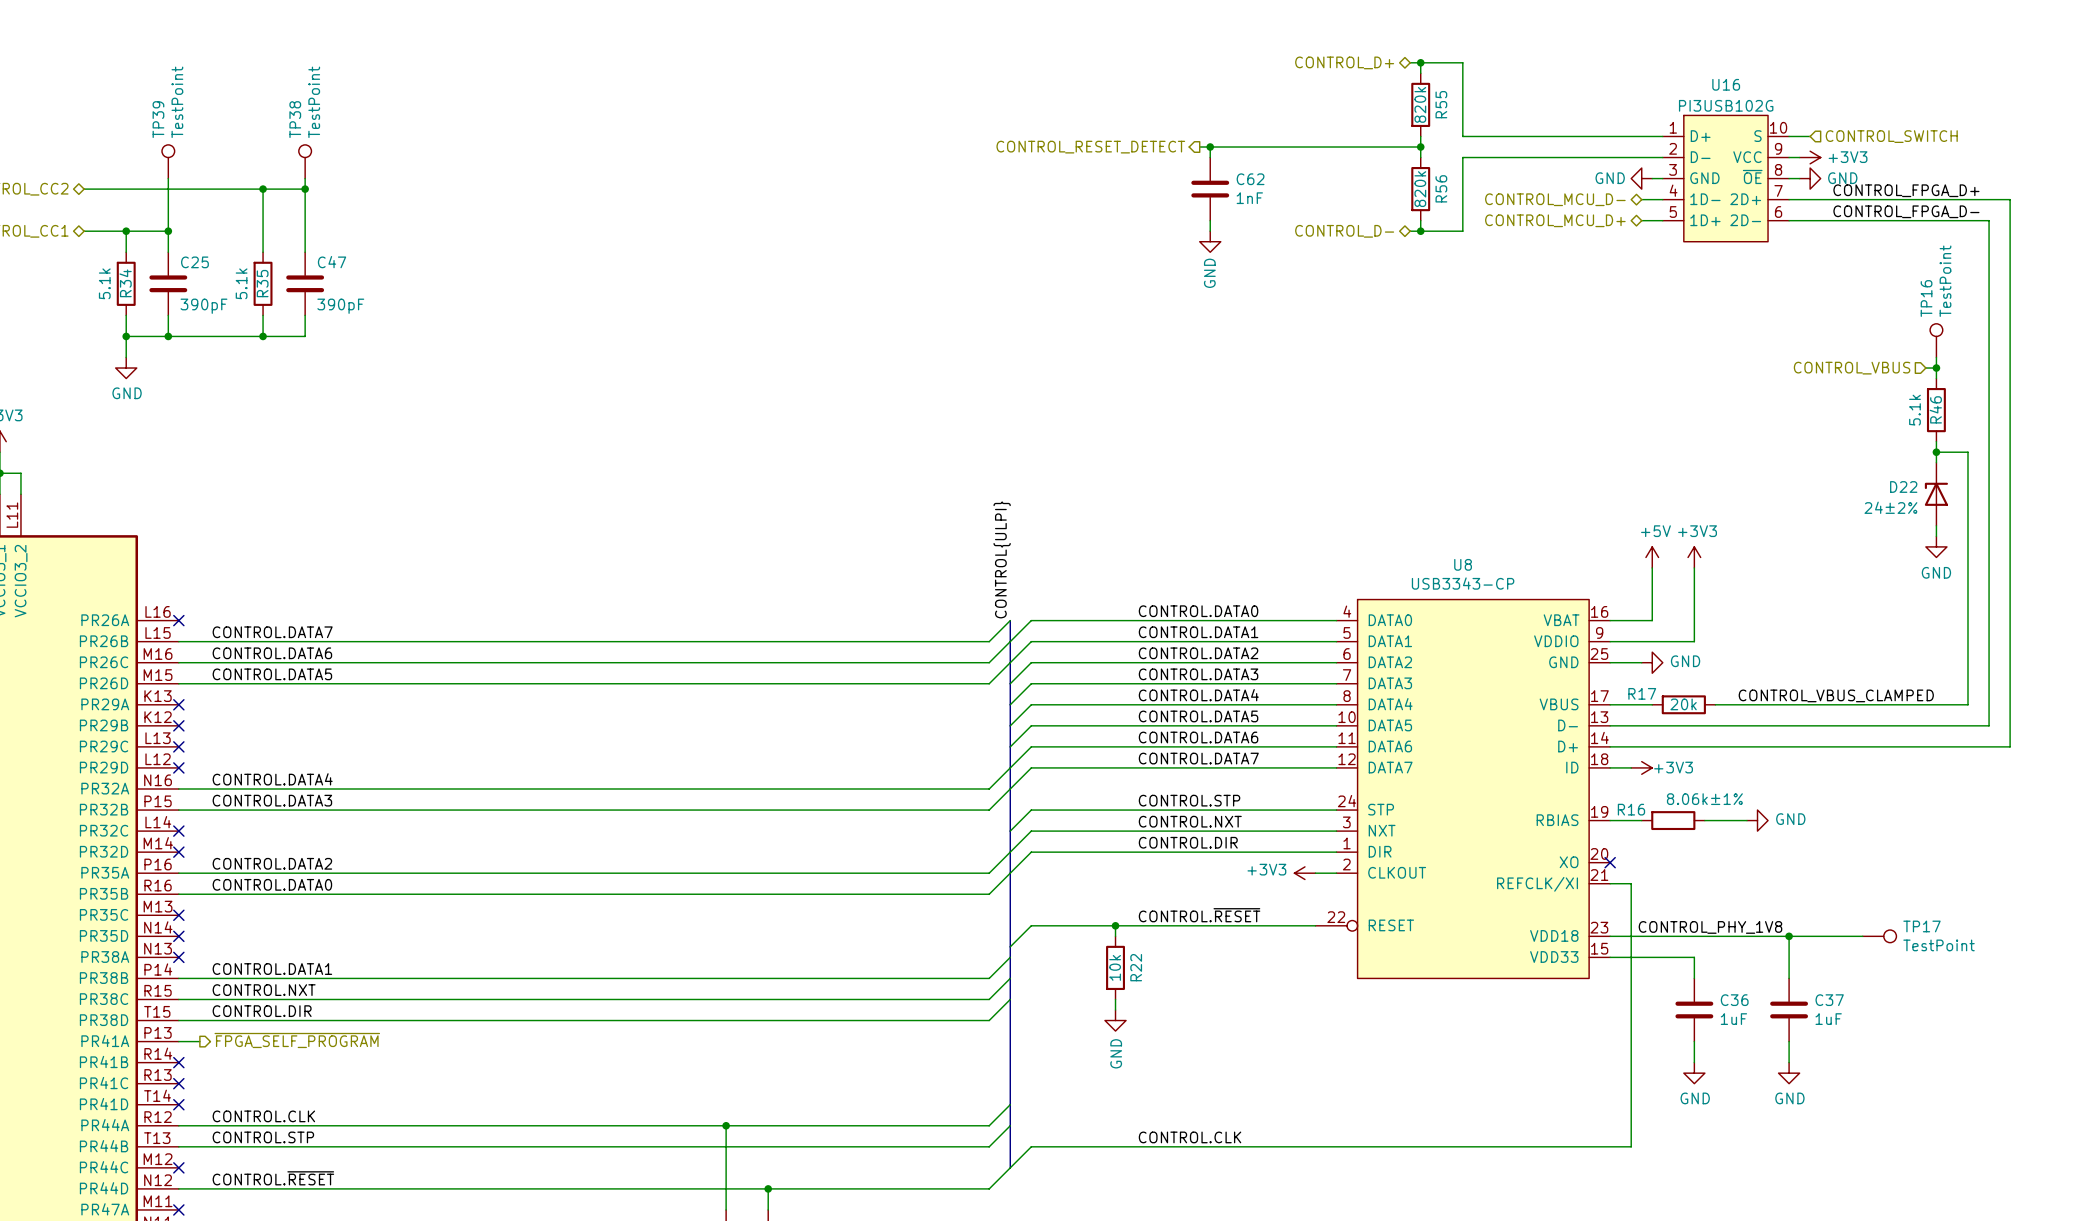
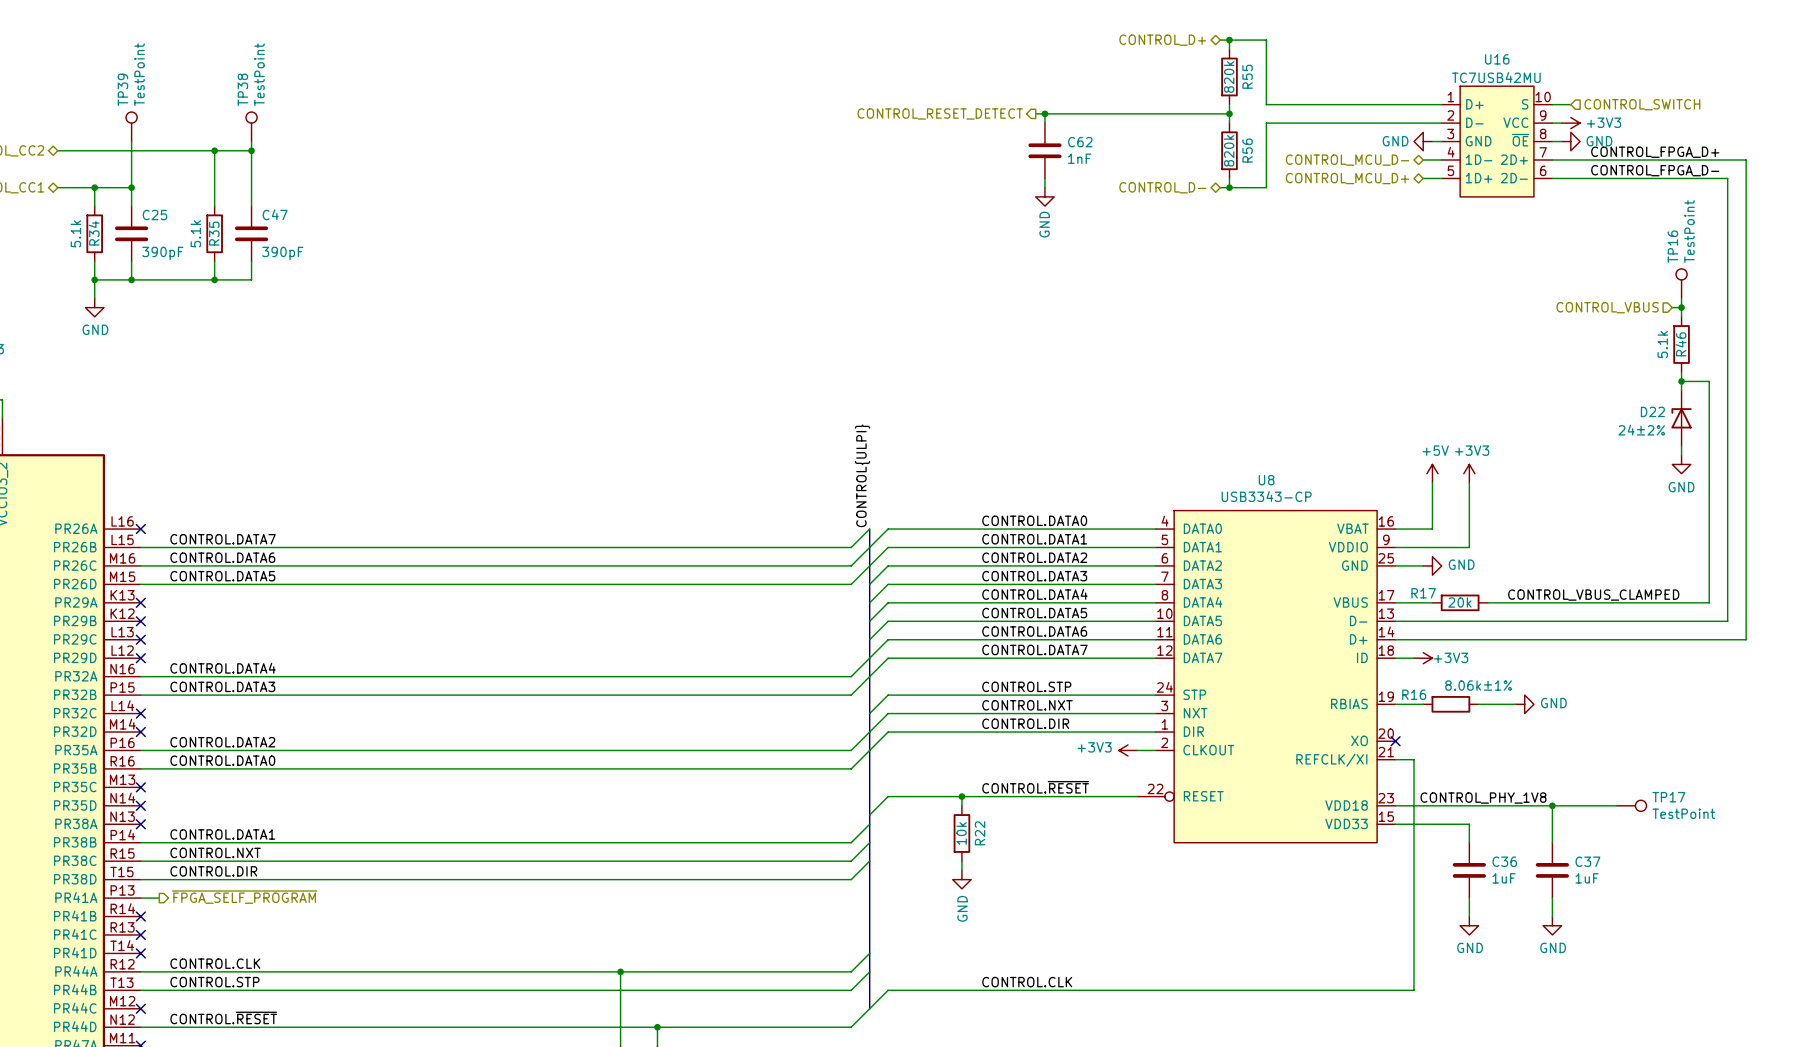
U16 value: PI3USB102G (1726, 105) -> TC7USB42MU (1496, 77)

